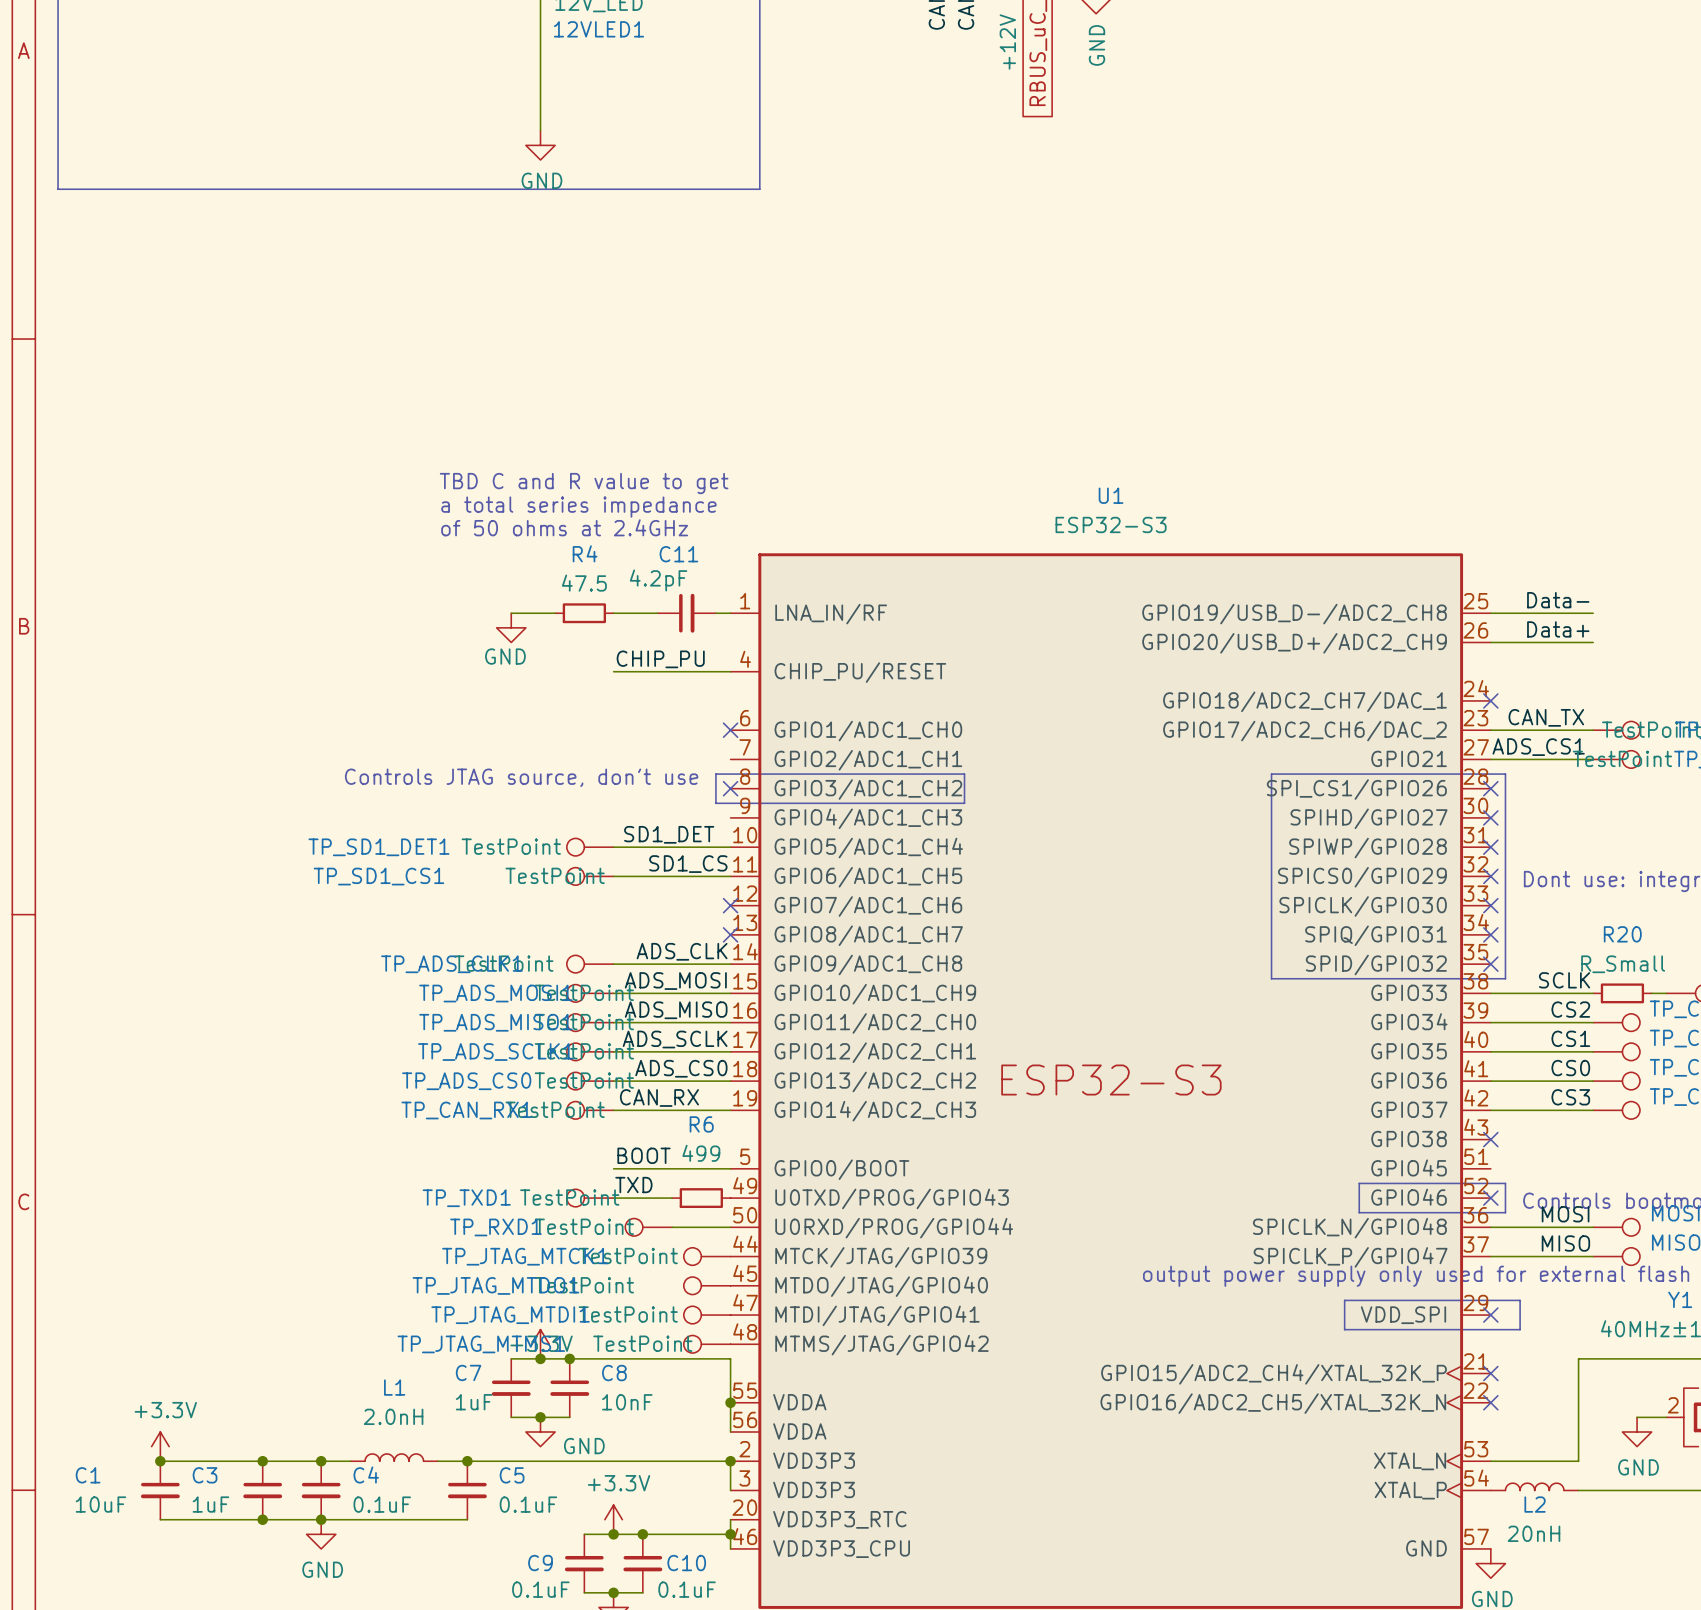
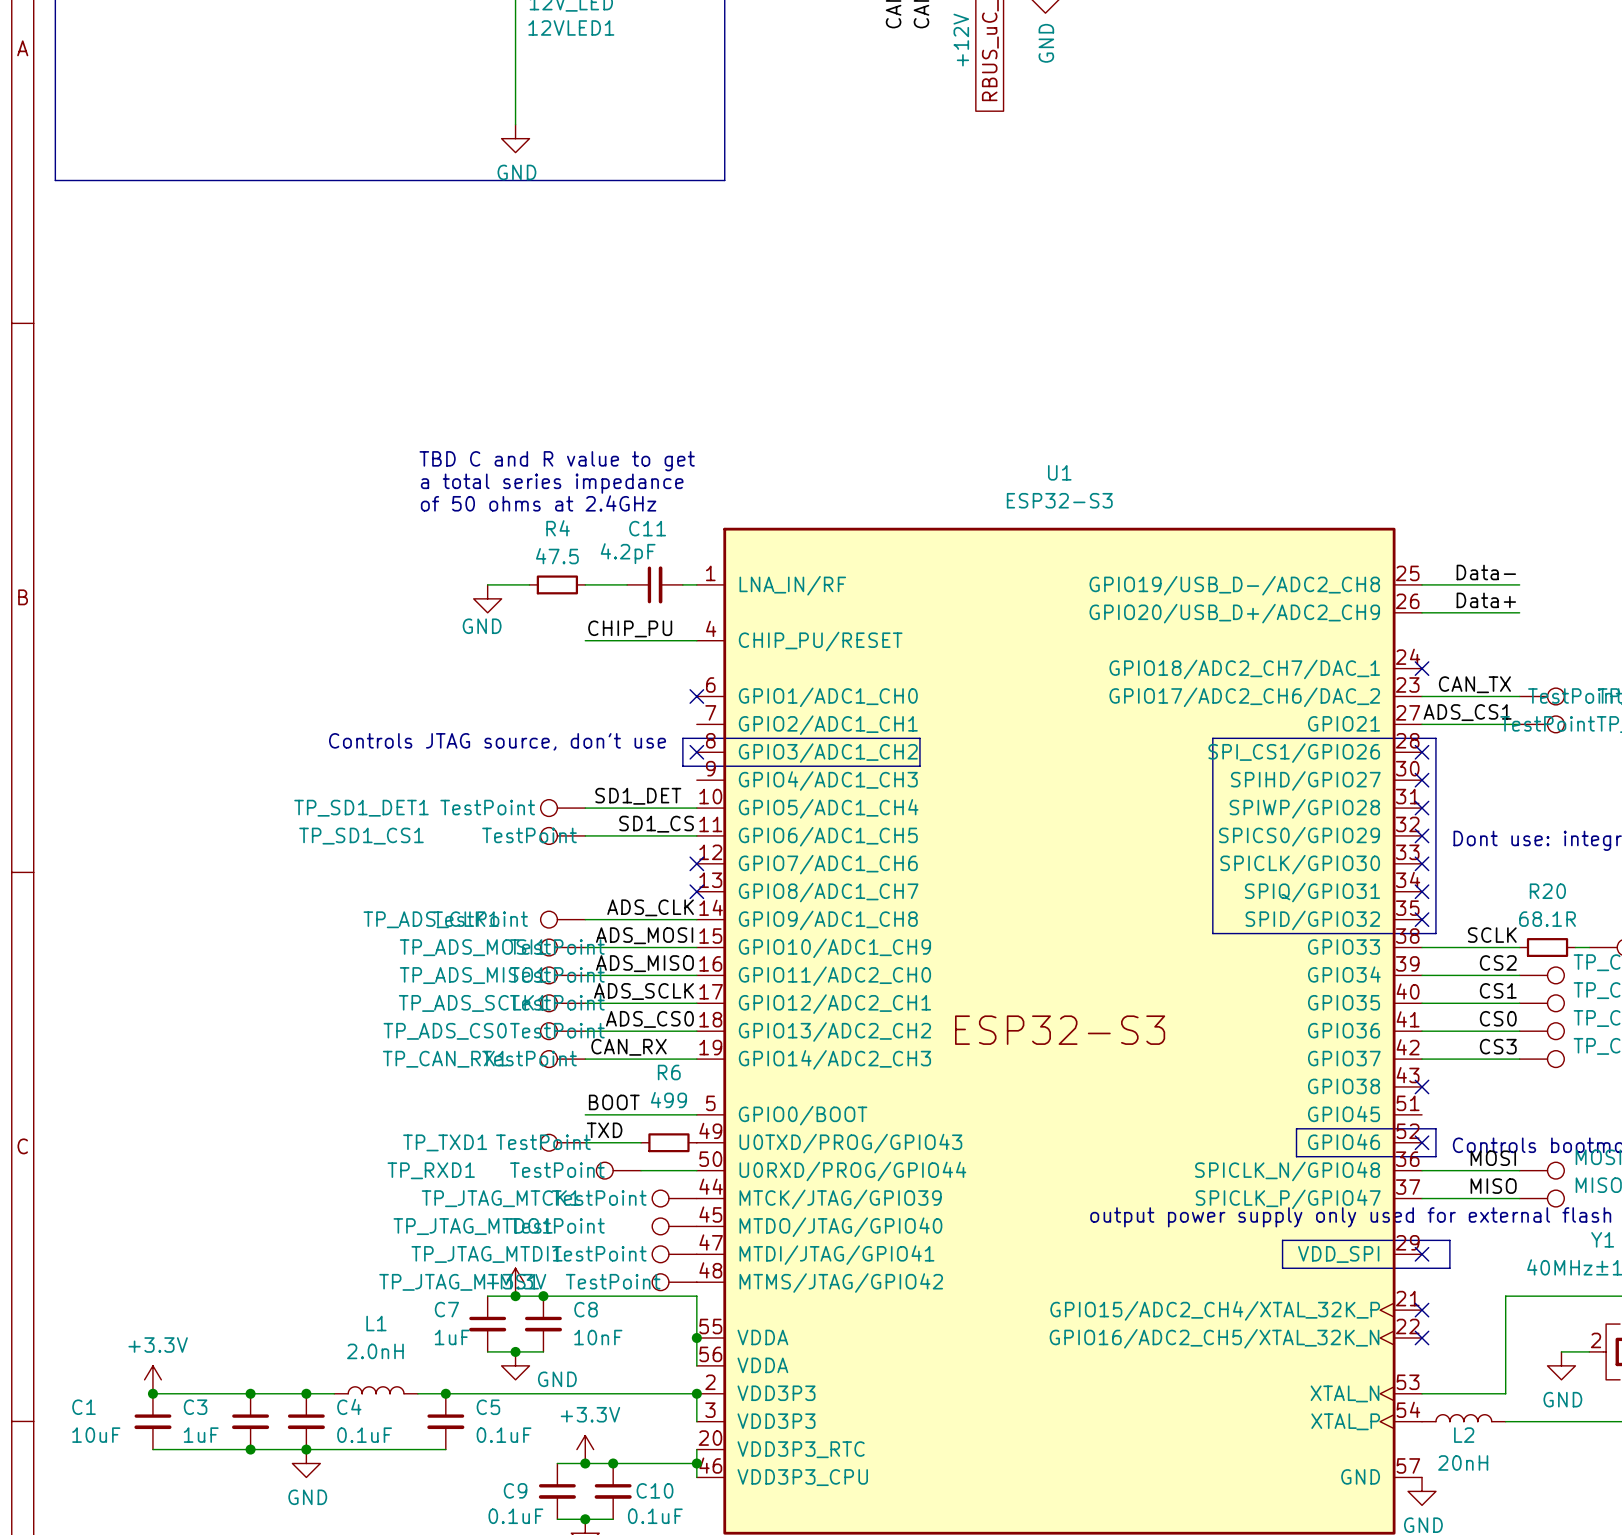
R20 value: R_Small (1623, 964) -> 68.1R (1547, 919)
TP_RXD1 name position: TP_RXD1 (495, 1227) -> TP_RXD1 (431, 1170)

